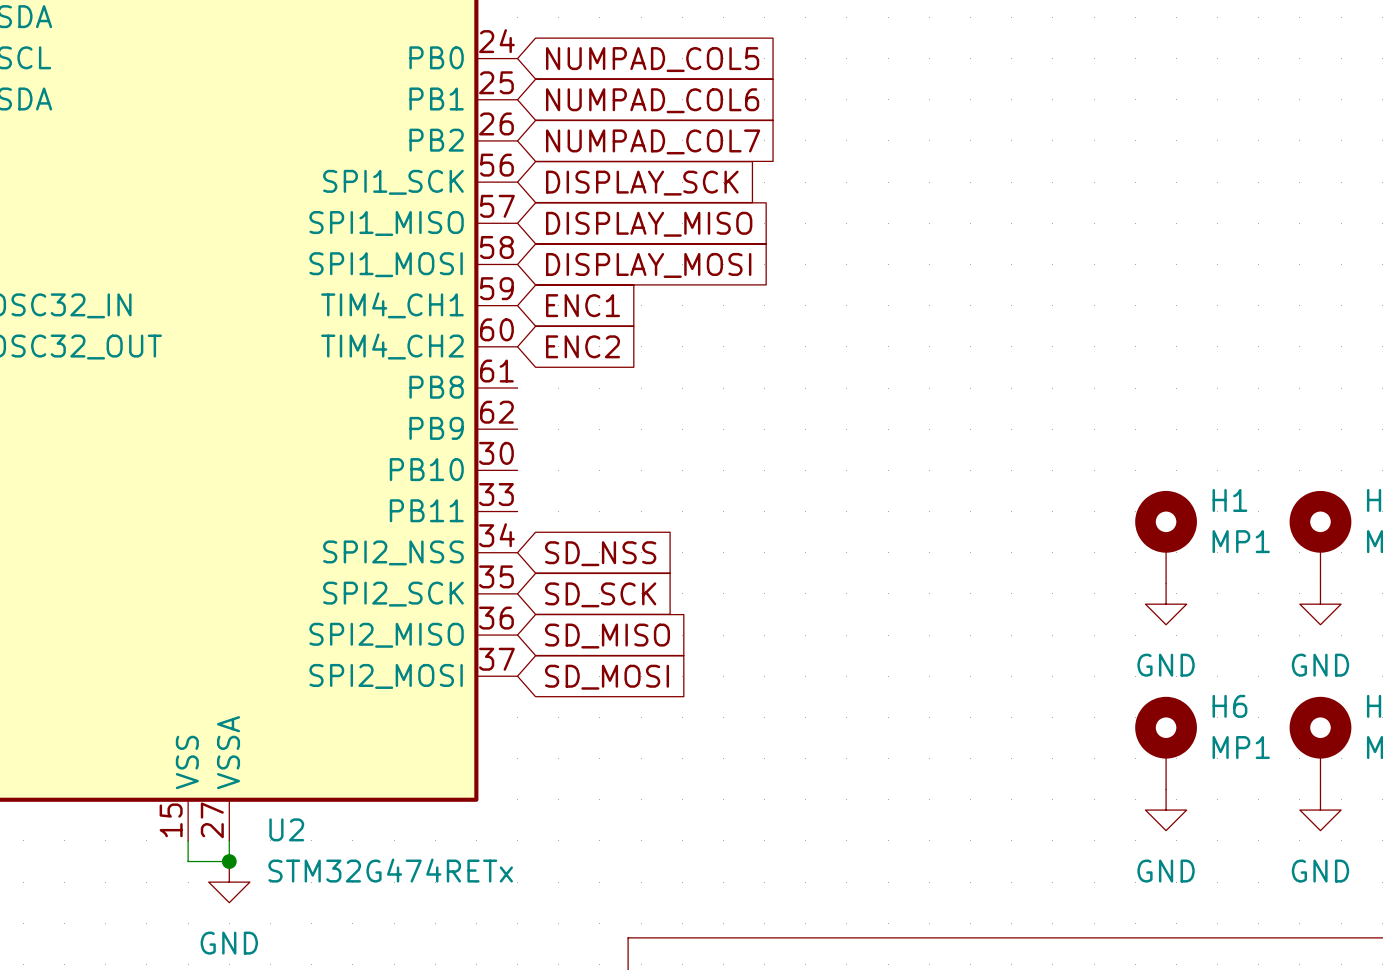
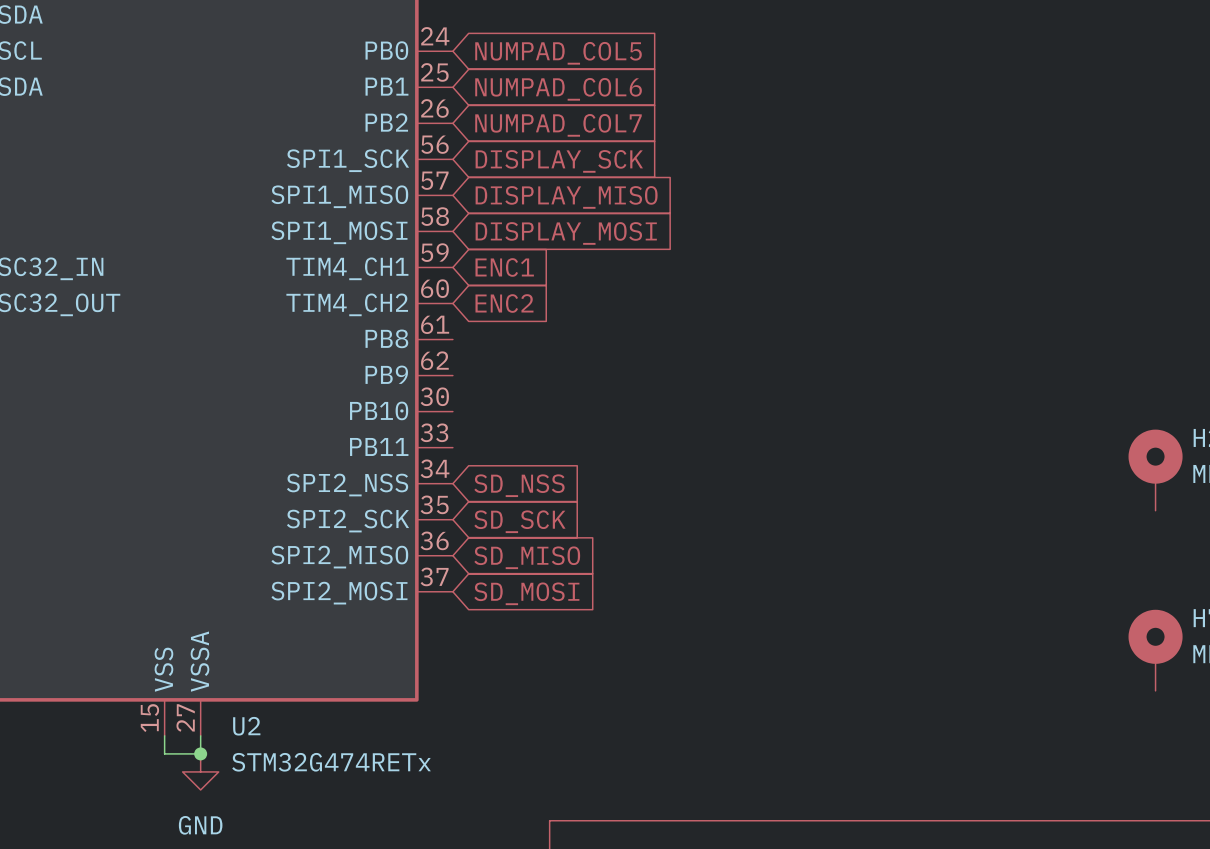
H1: MP1 (1166, 537) -> none
power symbol: GND (1166, 604) -> none
power symbol: GND (1320, 604) -> none
H6: MP1 (1166, 743) -> none
power symbol: GND (1166, 810) -> none
power symbol: GND (1320, 810) -> none

